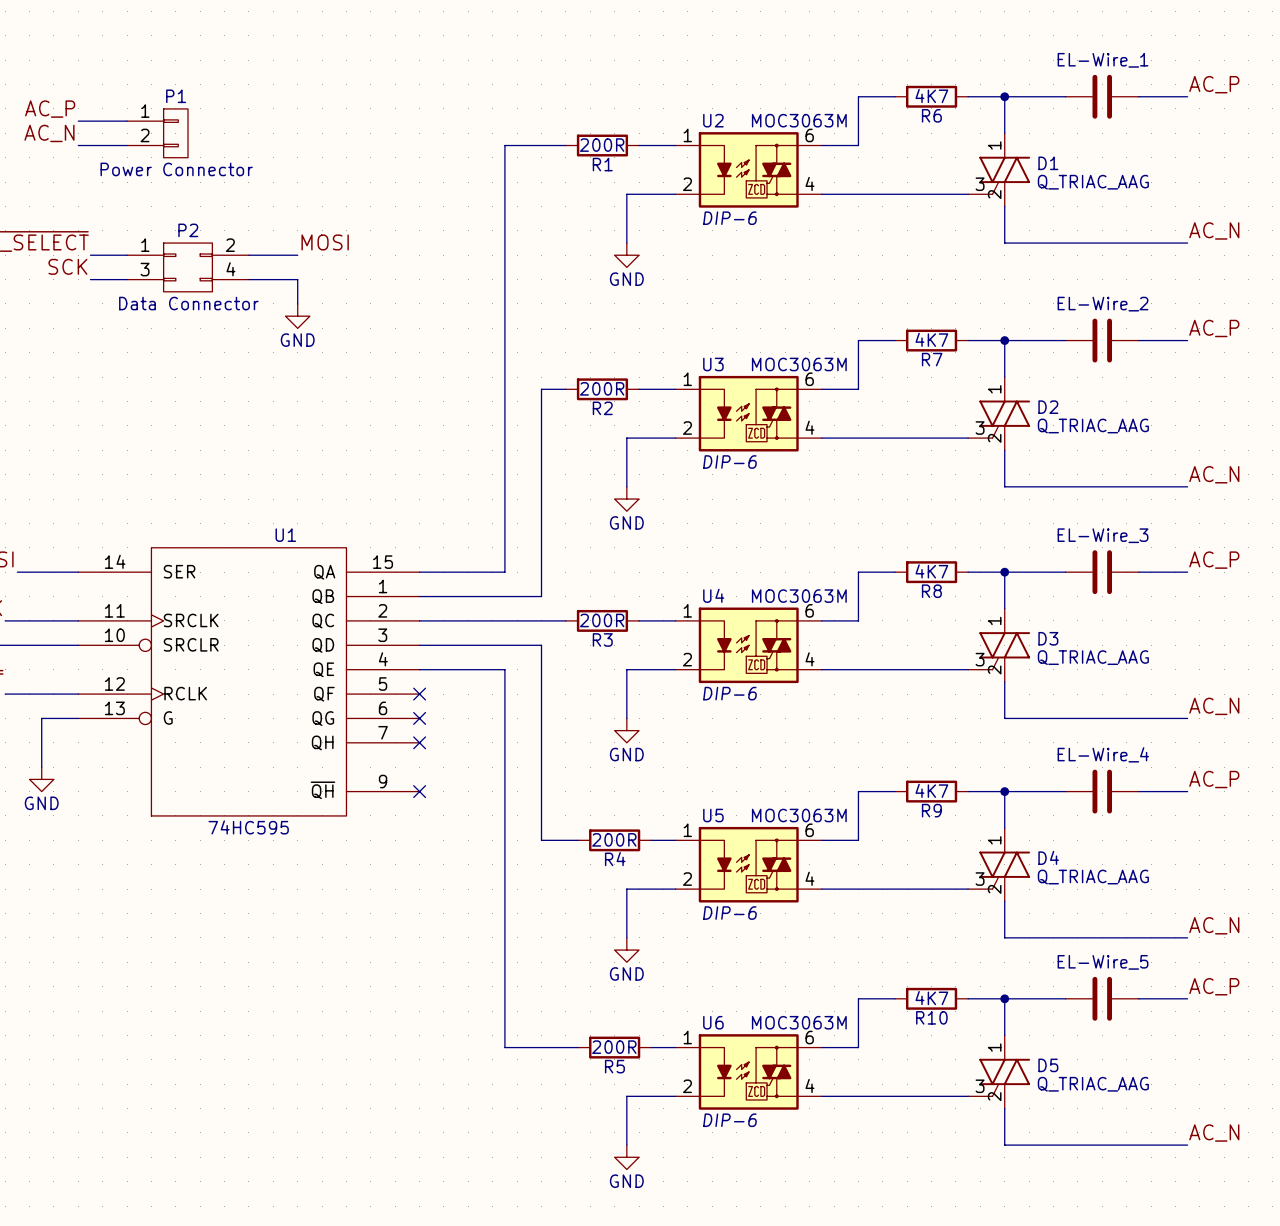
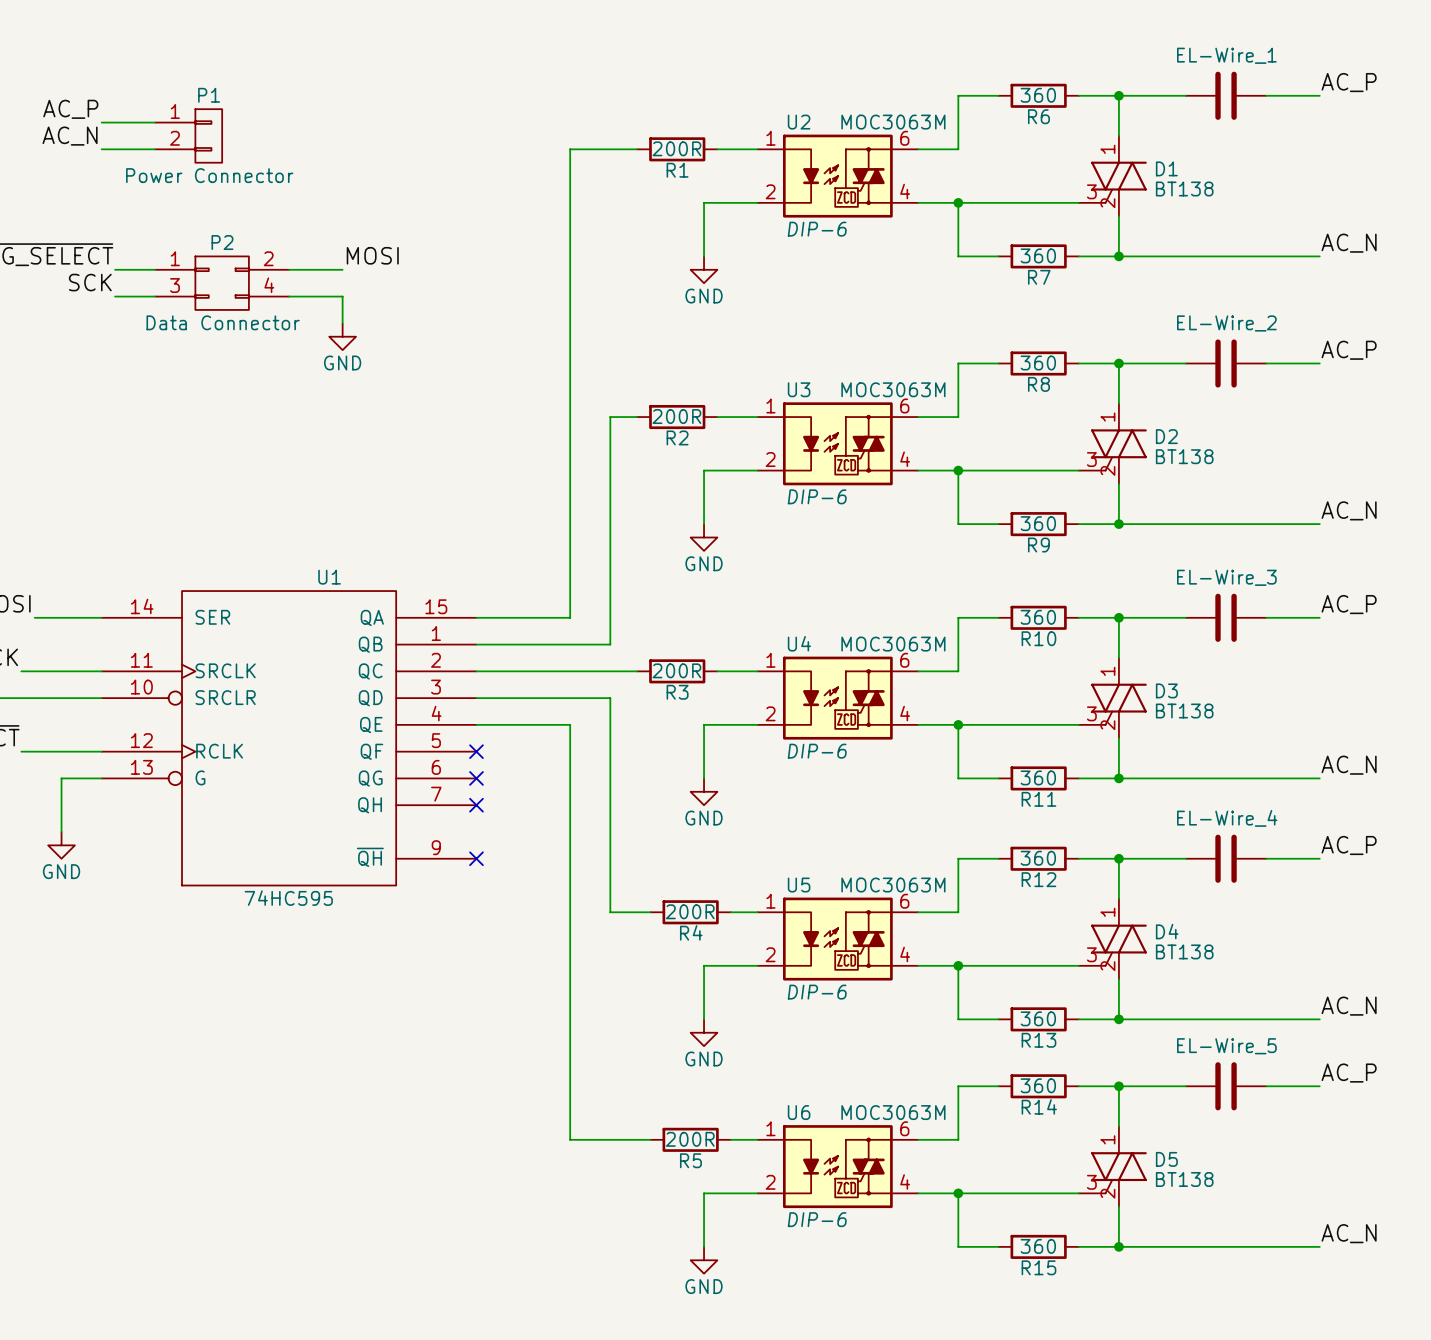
R6 value: 4K7 (931, 96) -> 360 (1038, 95)
D1 value: Q_TRIAC_AAG (1093, 182) -> BT138 (1184, 188)
wire: none -> (958, 202) (958, 256) (998, 256)
junction: none -> (958, 202)
R7: none -> 360 (1038, 256)
wire: none -> (1078, 256) (1118, 256)
junction: none -> (1118, 256)
R7 value: 4K7 (931, 339) -> 360 (1038, 362)
R7 name: R7 (932, 359) -> R8 (1038, 384)
D2 value: Q_TRIAC_AAG (1093, 426) -> BT138 (1184, 456)
wire: none -> (958, 470) (958, 524) (998, 524)
junction: none -> (958, 470)
R9: none -> 360 (1038, 524)
wire: none -> (1078, 524) (1118, 524)
junction: none -> (1118, 524)
R8 value: 4K7 (931, 571) -> 360 (1038, 617)
R8 name: R8 (931, 591) -> R10 (1038, 638)
D3 value: Q_TRIAC_AAG (1093, 657) -> BT138 (1184, 711)
wire: none -> (958, 724) (958, 778) (998, 778)
junction: none -> (958, 724)
R11: none -> 360 (1038, 778)
wire: none -> (1078, 778) (1118, 778)
junction: none -> (1118, 778)
R9 value: 4K7 (931, 790) -> 360 (1038, 858)
R9 name: R9 (931, 810) -> R12 (1038, 879)
D4 value: Q_TRIAC_AAG (1093, 877) -> BT138 (1184, 951)
wire: none -> (958, 965) (958, 1019) (998, 1019)
junction: none -> (958, 965)
R13: none -> 360 (1038, 1019)
wire: none -> (1078, 1019) (1118, 1019)
junction: none -> (1118, 1019)
R10 value: 4K7 (931, 998) -> 360 (1038, 1085)
R10 name: R10 (931, 1017) -> R14 (1039, 1106)
D5 value: Q_TRIAC_AAG (1093, 1084) -> BT138 (1184, 1179)
wire: none -> (958, 1193) (958, 1246) (998, 1246)
junction: none -> (958, 1193)
R15: none -> 360 (1038, 1246)
wire: none -> (1078, 1246) (1118, 1246)
junction: none -> (1118, 1246)

